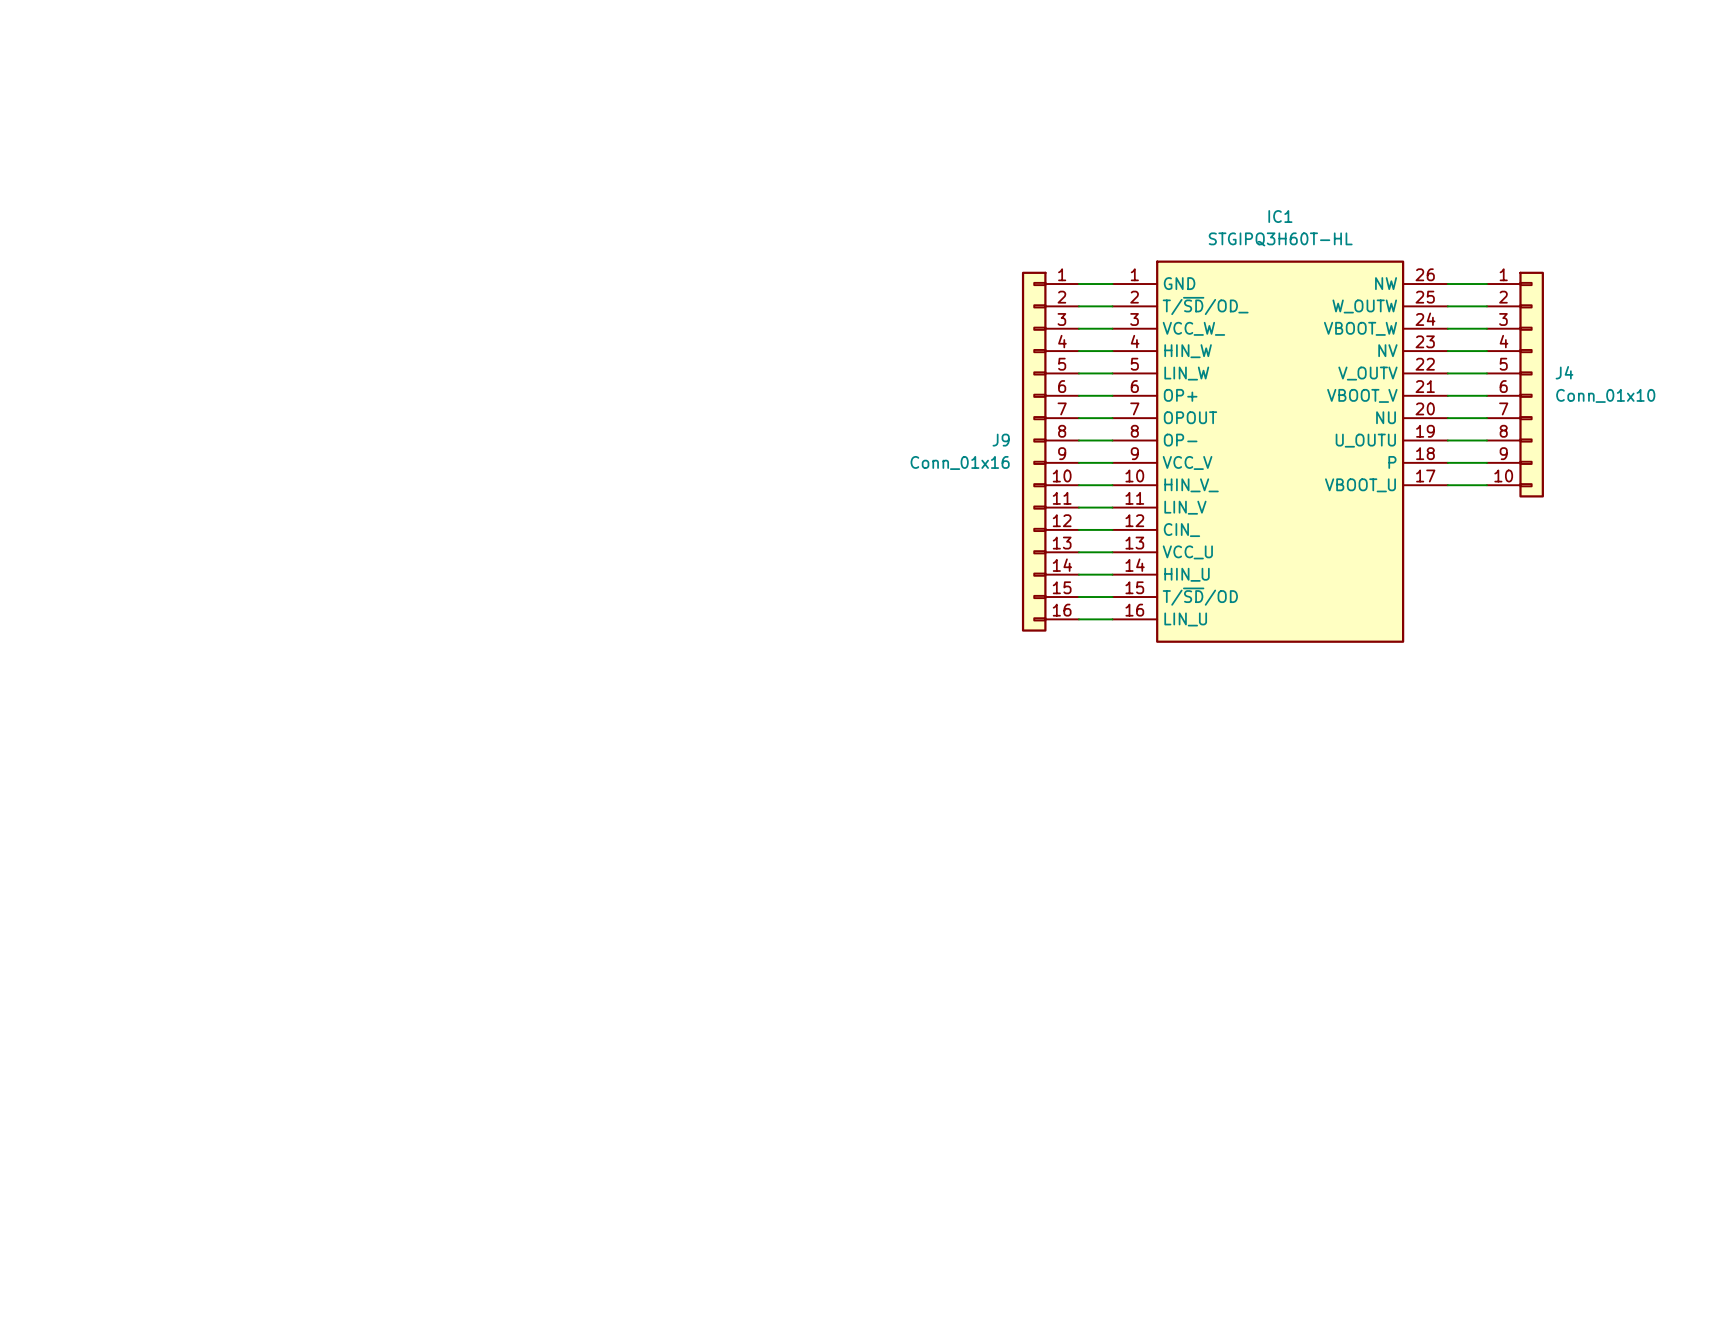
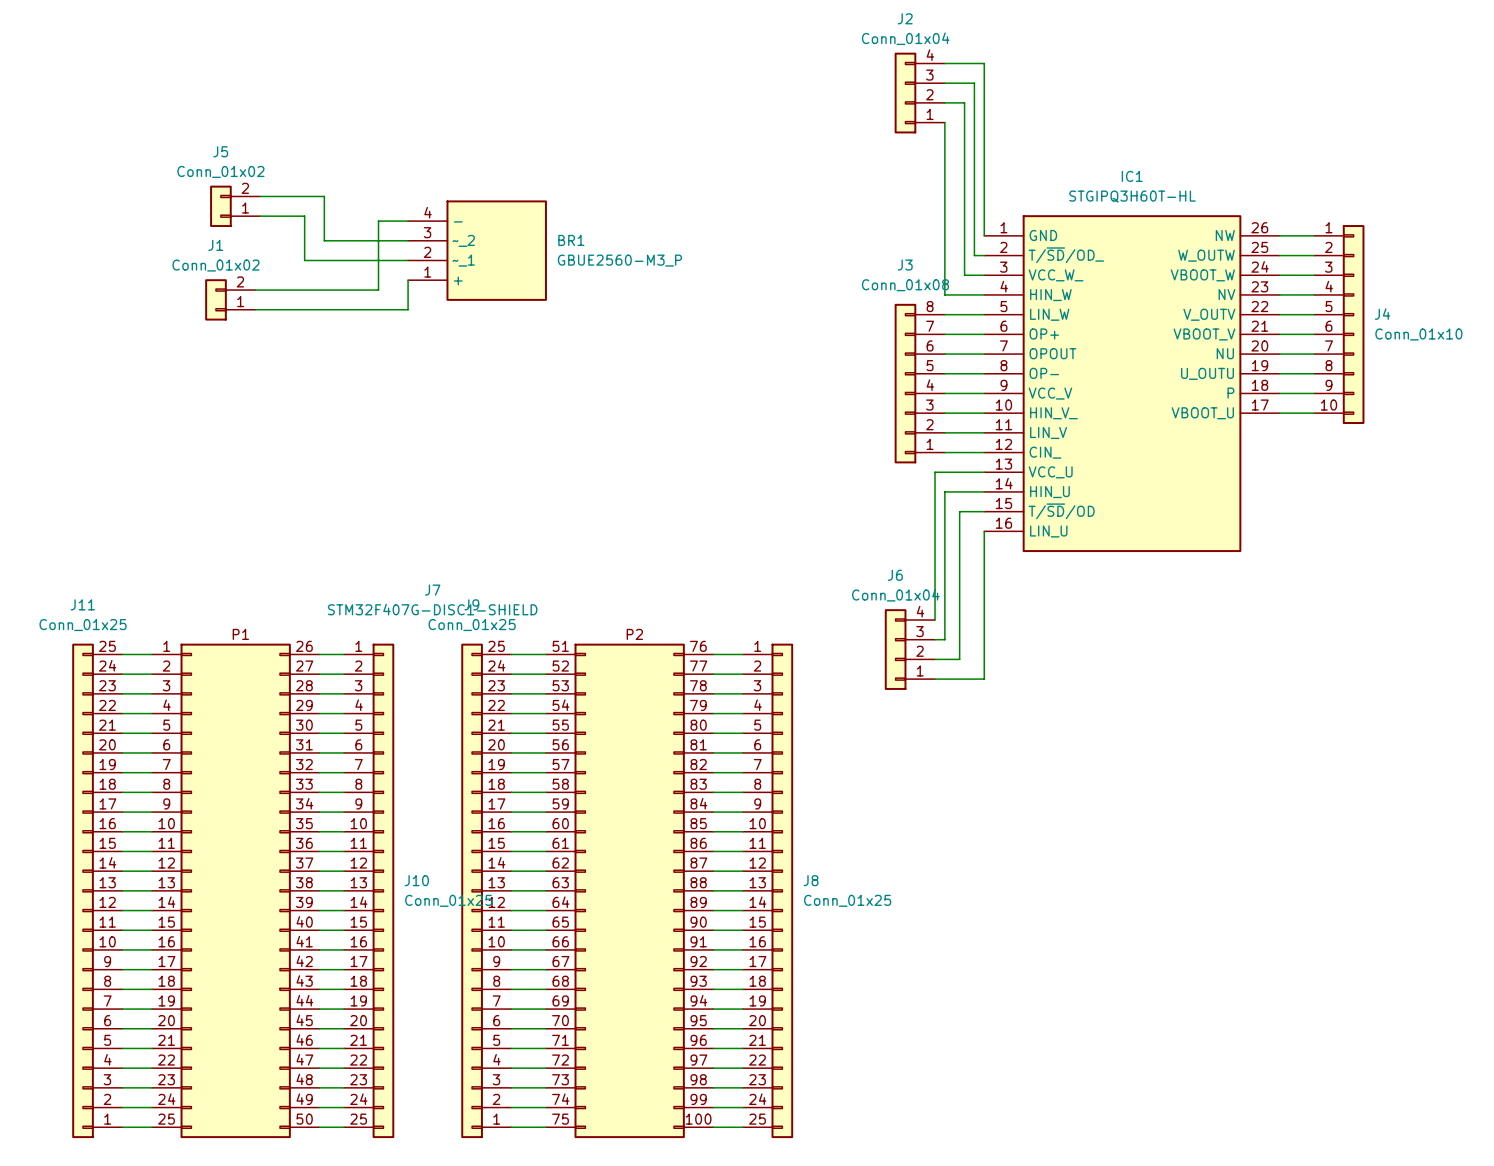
J2: none -> Conn_01x04 (919, 93)
wire: none -> (944, 122) (944, 294) (954, 294)
wire: none -> (260, 196) (324, 196) (324, 240) (408, 240)
J5: none -> Conn_01x02 (235, 206)
wire: none -> (260, 216) (304, 216) (304, 260) (408, 260)
wire: none -> (408, 221) (378, 221) (378, 290) (255, 290)
J9 symbol: [1021, 271, 1079, 632] -> [461, 643, 512, 1139]
wire: (1078, 284) (1112, 284) -> (944, 63) (984, 63) (984, 235)
BR1: none -> GBUE2560-M3_P (477, 250)
wire: (1078, 306) (1101, 306) -> (944, 83) (974, 83) (974, 255)
wire: (1078, 328) (1090, 328) -> (944, 102) (964, 102) (964, 275)
wire: none -> (408, 280) (408, 309) (255, 309)
J1: none -> Conn_01x02 (230, 299)
J9 name position: J9 (1001, 440) -> J9 (471, 604)
J3: none -> Conn_01x08 (919, 383)
J9 value: Conn_01x16 (960, 462) -> Conn_01x25 (472, 625)
wire: none -> (954, 472) (935, 472) (935, 620)
wire: none -> (954, 491) (944, 491) (944, 639) (935, 639)
wire: (1078, 597) (1084, 597) -> (935, 659) (959, 659) (959, 511)
wire: (1078, 619) (1112, 619) -> (935, 679) (984, 679) (984, 531)
J6: none -> Conn_01x04 (909, 649)
wire: none -> (122, 654) (151, 654)
wire: none -> (319, 654) (344, 654)
wire: none -> (511, 654) (545, 654)
wire: none -> (713, 654) (742, 654)
wire: none -> (122, 674) (151, 674)
wire: none -> (319, 674) (344, 674)
wire: none -> (511, 674) (545, 674)
wire: none -> (713, 674) (742, 674)
wire: none -> (122, 693) (151, 693)
wire: none -> (319, 693) (344, 693)
wire: none -> (511, 693) (545, 693)
wire: none -> (713, 693) (742, 693)
wire: none -> (122, 713) (151, 713)
wire: none -> (319, 713) (344, 713)
wire: none -> (511, 713) (545, 713)
wire: none -> (713, 713) (742, 713)
wire: none -> (122, 733) (151, 733)
wire: none -> (319, 733) (344, 733)
wire: none -> (511, 733) (545, 733)
wire: none -> (713, 733) (742, 733)
wire: none -> (122, 752) (151, 752)
wire: none -> (319, 752) (344, 752)
wire: none -> (511, 752) (545, 752)
wire: none -> (713, 752) (742, 752)
wire: none -> (122, 772) (151, 772)
wire: none -> (319, 772) (344, 772)
wire: none -> (511, 772) (545, 772)
wire: none -> (713, 772) (742, 772)
wire: none -> (122, 792) (151, 792)
wire: none -> (319, 792) (344, 792)
wire: none -> (511, 792) (545, 792)
wire: none -> (713, 792) (742, 792)
wire: none -> (122, 812) (151, 812)
wire: none -> (319, 812) (344, 812)
wire: none -> (511, 812) (545, 812)
wire: none -> (713, 812) (742, 812)
wire: none -> (122, 831) (151, 831)
wire: none -> (319, 831) (344, 831)
wire: none -> (511, 831) (545, 831)
wire: none -> (713, 831) (742, 831)
wire: none -> (122, 851) (151, 851)
wire: none -> (319, 851) (344, 851)
wire: none -> (511, 851) (545, 851)
wire: none -> (713, 851) (742, 851)
wire: none -> (122, 871) (151, 871)
wire: none -> (319, 871) (344, 871)
wire: none -> (511, 871) (545, 871)
wire: none -> (713, 871) (742, 871)
J11: none -> Conn_01x25 (97, 890)
wire: none -> (122, 890) (151, 890)
wire: none -> (319, 890) (344, 890)
J10: none -> Conn_01x25 (369, 890)
J7: none -> STM32F407G-DISC1-SHIELD (432, 890)
wire: none -> (511, 890) (545, 890)
wire: none -> (713, 890) (742, 890)
J8: none -> Conn_01x25 (768, 890)
wire: none -> (122, 910) (151, 910)
wire: none -> (319, 910) (344, 910)
wire: none -> (511, 910) (545, 910)
wire: none -> (713, 910) (742, 910)
wire: none -> (122, 930) (151, 930)
wire: none -> (319, 930) (344, 930)
wire: none -> (511, 930) (545, 930)
wire: none -> (713, 930) (742, 930)
wire: none -> (122, 949) (151, 949)
wire: none -> (319, 949) (344, 949)
wire: none -> (511, 949) (545, 949)
wire: none -> (713, 949) (742, 949)
wire: none -> (122, 969) (151, 969)
wire: none -> (319, 969) (344, 969)
wire: none -> (511, 969) (545, 969)
wire: none -> (713, 969) (742, 969)
wire: none -> (122, 989) (151, 989)
wire: none -> (319, 989) (344, 989)
wire: none -> (511, 989) (545, 989)
wire: none -> (713, 989) (742, 989)
wire: none -> (122, 1009) (151, 1009)
wire: none -> (319, 1009) (344, 1009)
wire: none -> (511, 1009) (545, 1009)
wire: none -> (713, 1009) (742, 1009)
wire: none -> (122, 1028) (151, 1028)
wire: none -> (319, 1028) (344, 1028)
wire: none -> (511, 1028) (545, 1028)
wire: none -> (713, 1028) (742, 1028)
wire: none -> (122, 1048) (151, 1048)
wire: none -> (319, 1048) (344, 1048)
wire: none -> (511, 1048) (545, 1048)
wire: none -> (713, 1048) (742, 1048)
wire: none -> (122, 1068) (151, 1068)
wire: none -> (319, 1068) (344, 1068)
wire: none -> (511, 1068) (545, 1068)
wire: none -> (713, 1068) (742, 1068)
wire: none -> (122, 1087) (151, 1087)
wire: none -> (319, 1087) (344, 1087)
wire: none -> (511, 1087) (545, 1087)
wire: none -> (713, 1087) (742, 1087)
wire: none -> (122, 1107) (151, 1107)
wire: none -> (319, 1107) (344, 1107)
wire: none -> (511, 1107) (545, 1107)
wire: none -> (713, 1107) (742, 1107)
wire: none -> (122, 1127) (151, 1127)
wire: none -> (319, 1127) (344, 1127)
wire: none -> (511, 1127) (545, 1127)
wire: none -> (713, 1127) (742, 1127)

